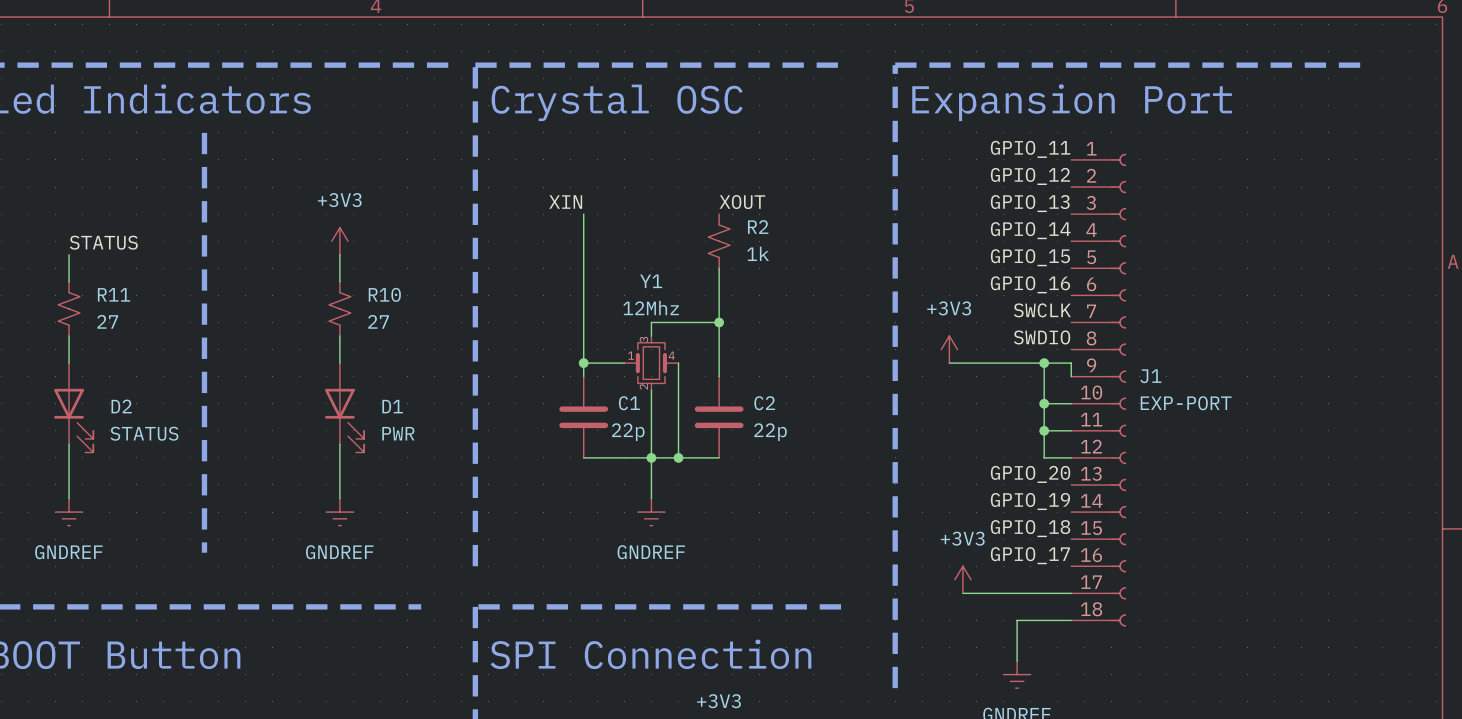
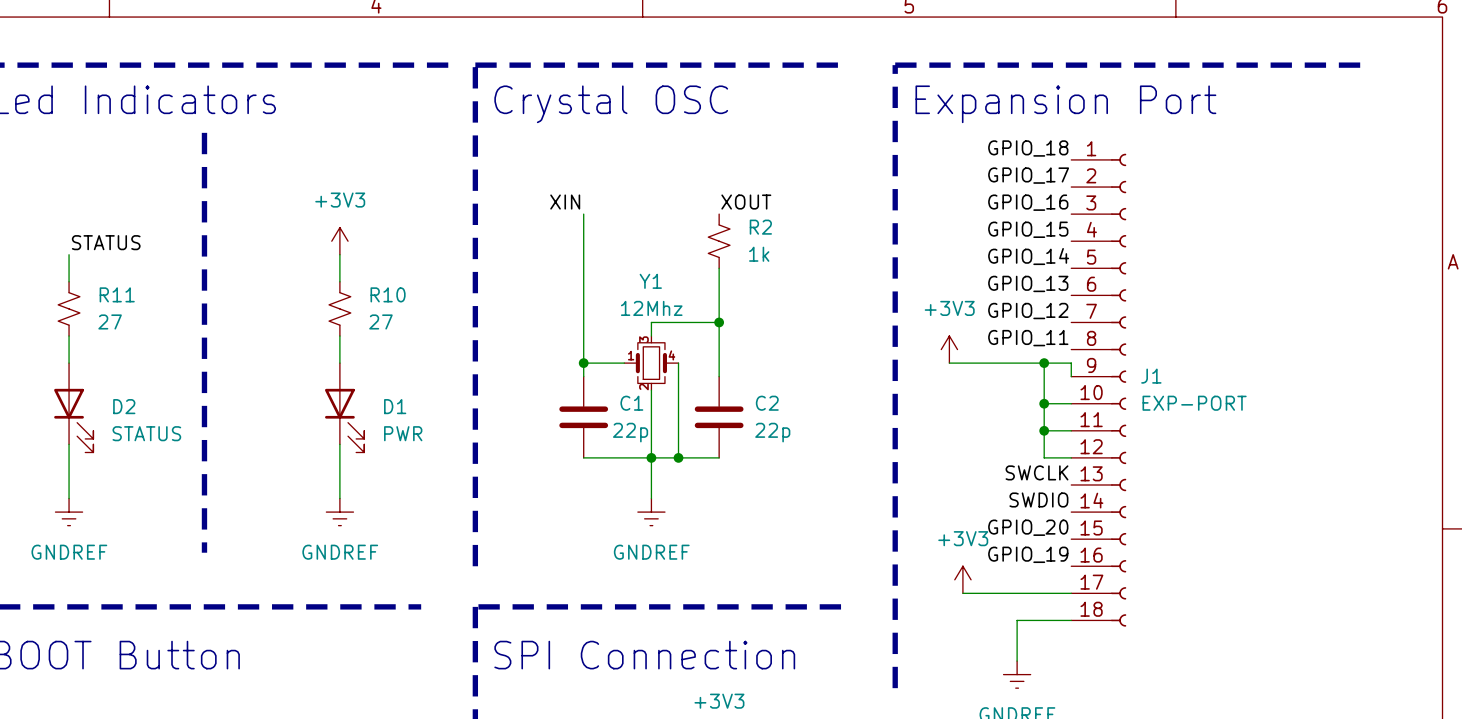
label: GPIO_11 (1030, 149) -> GPIO_18 (1028, 148)
label: GPIO_12 (1030, 176) -> GPIO_17 (1028, 175)
label: GPIO_13 (1030, 203) -> GPIO_16 (1028, 202)
label: GPIO_14 (1030, 230) -> GPIO_15 (1028, 229)
label: GPIO_15 (1030, 257) -> GPIO_14 (1028, 256)
label: GPIO_16 (1030, 284) -> GPIO_13 (1028, 283)
label: SWCLK (1042, 310) -> GPIO_12 (1028, 311)
label: SWDIO (1042, 337) -> GPIO_11 (1028, 338)
label: GPIO_20 (1030, 474) -> SWCLK (1036, 472)
label: GPIO_19 (1030, 501) -> SWDIO (1038, 499)
label: GPIO_18 (1030, 528) -> GPIO_20 (1028, 527)
label: GPIO_17 (1030, 555) -> GPIO_19 (1028, 554)

